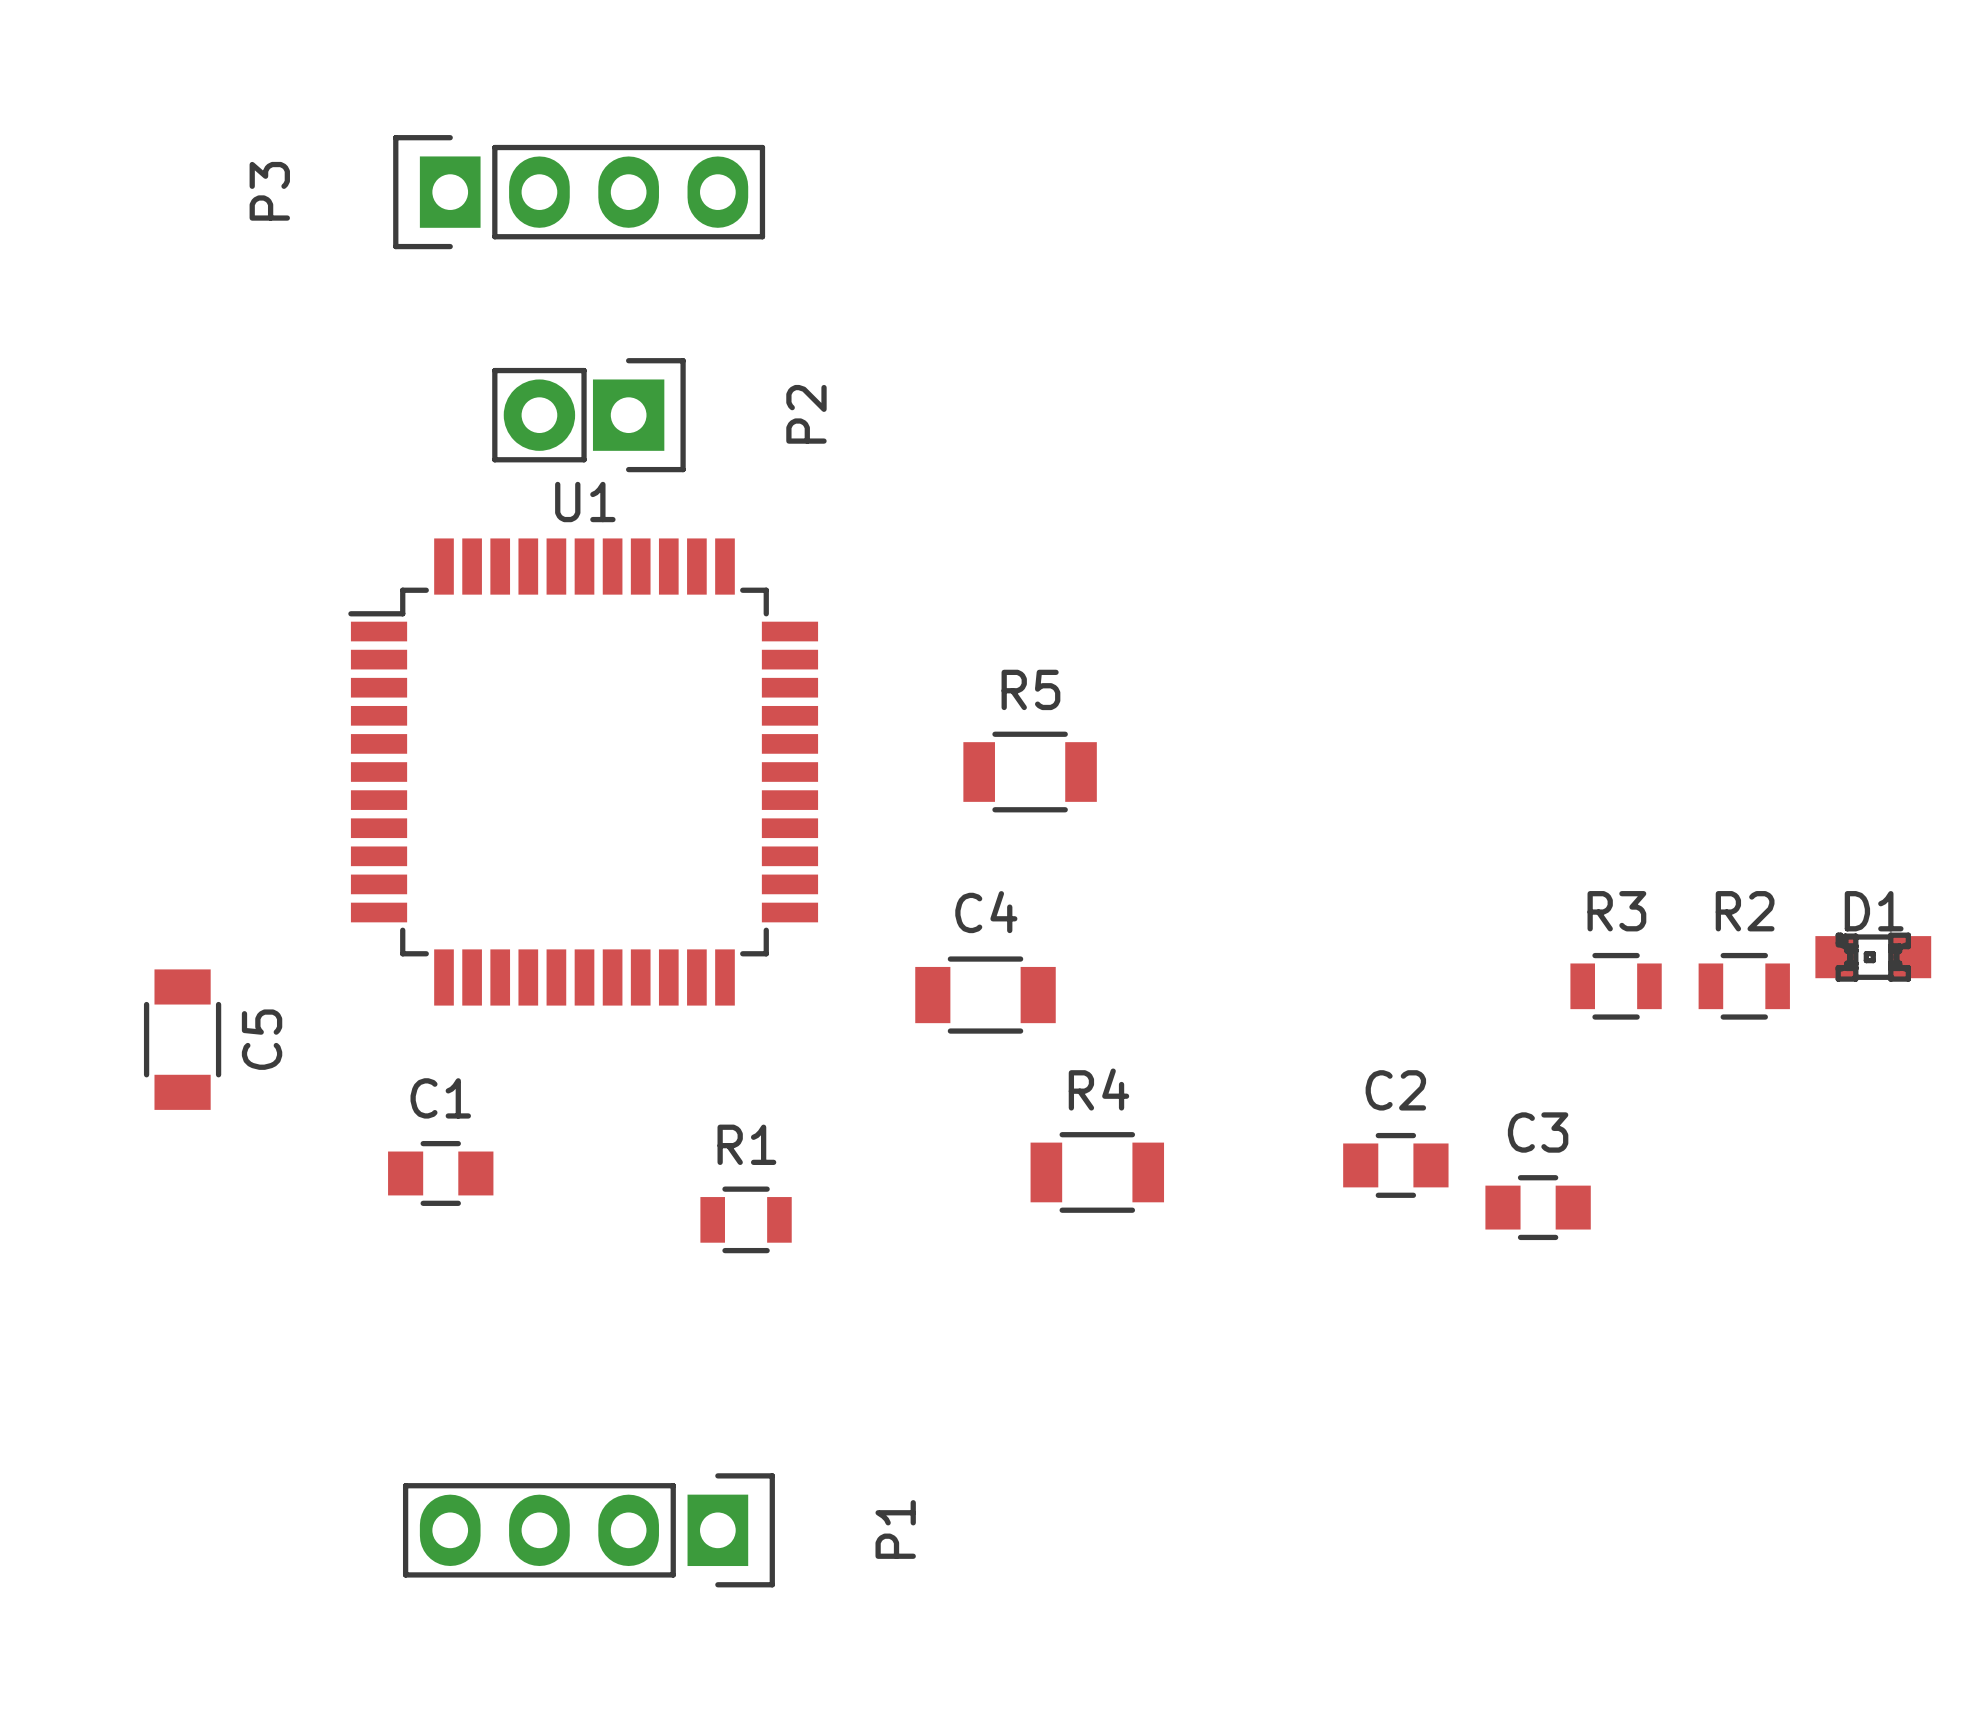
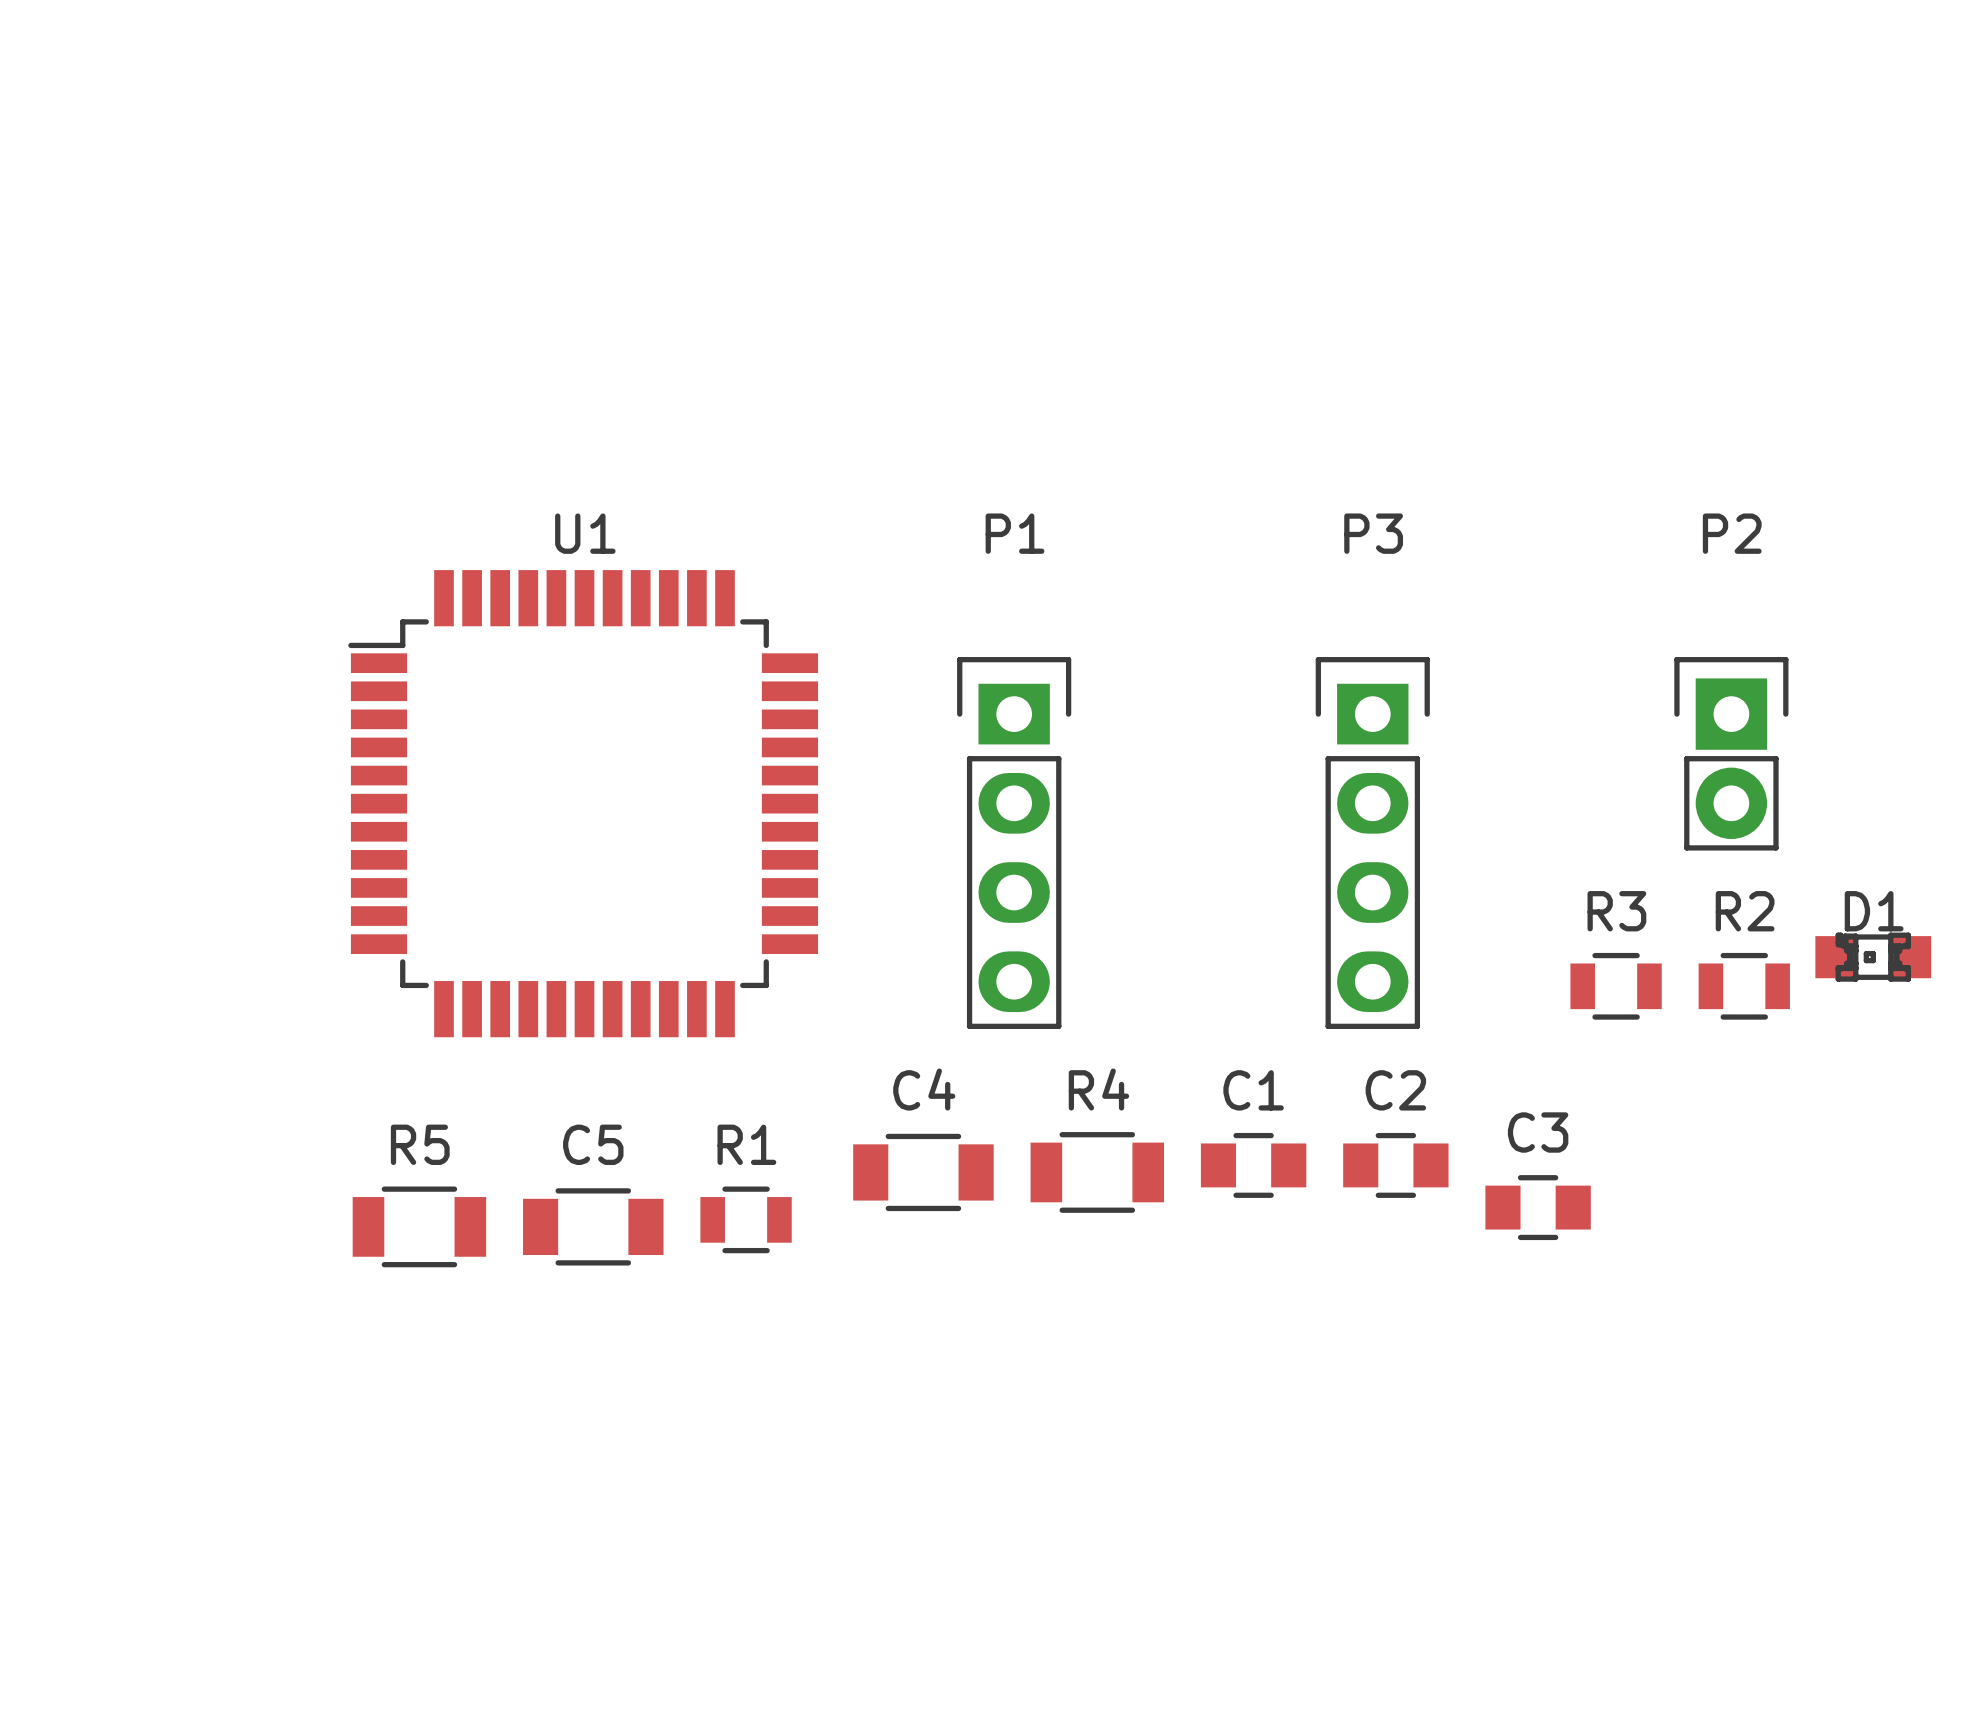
P3 rotation: 0° (579, 192) -> 90° clockwise (1372, 843)
P3 position: (579, 192) -> (1372, 843)
P2 rotation: 0° (588, 415) -> 90° counterclockwise (1731, 753)
P2 position: (588, 415) -> (1731, 753)
U1 position: (583, 772) -> (583, 803)
R5 position: (1030, 772) -> (419, 1226)
C4 position: (985, 995) -> (923, 1172)
C5 rotation: 0° (182, 1039) -> 90° clockwise (593, 1226)
C5 position: (182, 1039) -> (593, 1226)
C5 name position: C5 (262, 1039) -> C5 (593, 1144)
C1 position: (440, 1173) -> (1253, 1165)
P1 rotation: 0° (588, 1530) -> 90° counterclockwise (1014, 843)
P1 position: (588, 1530) -> (1014, 843)

